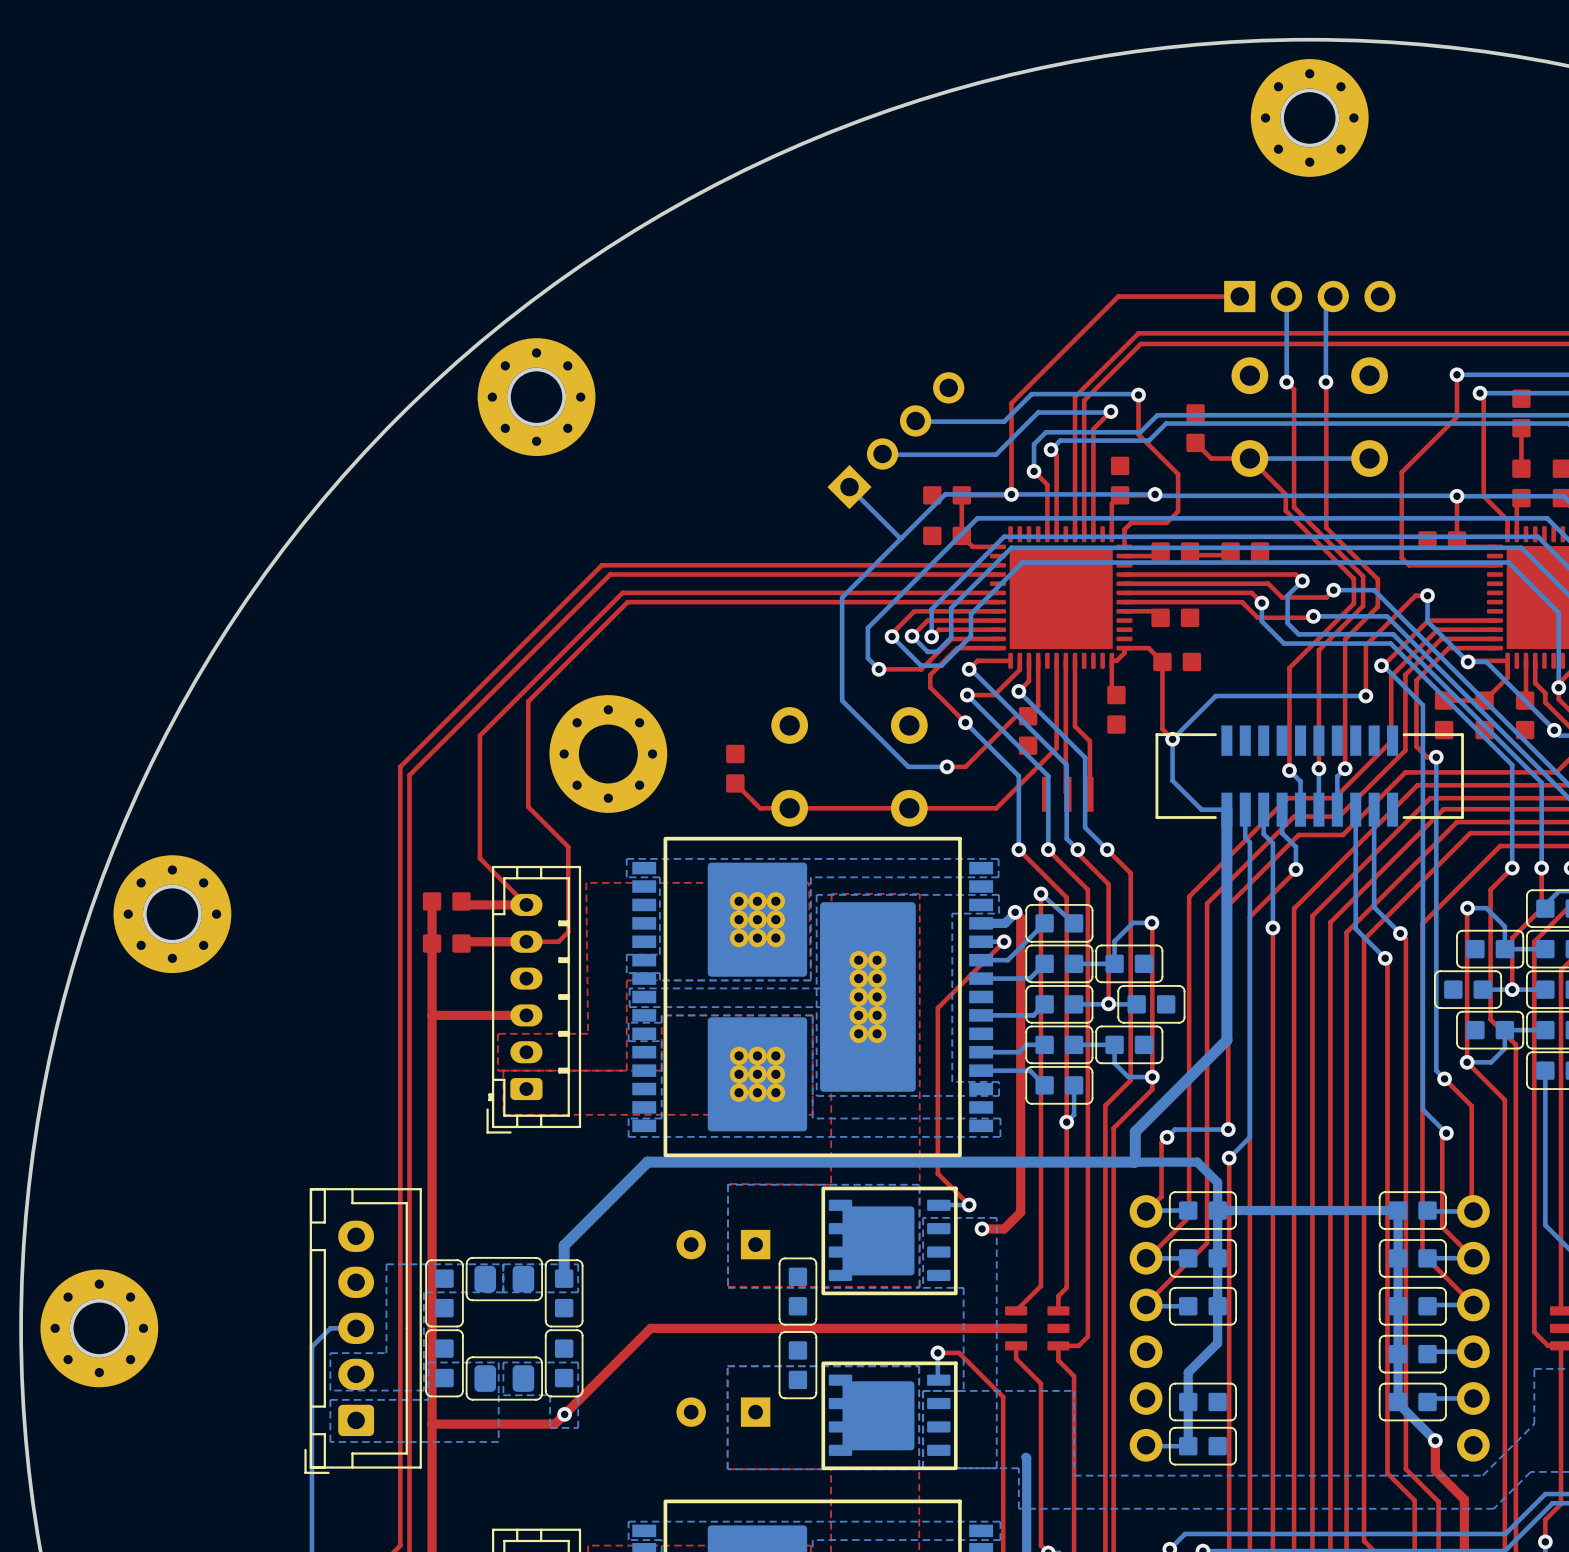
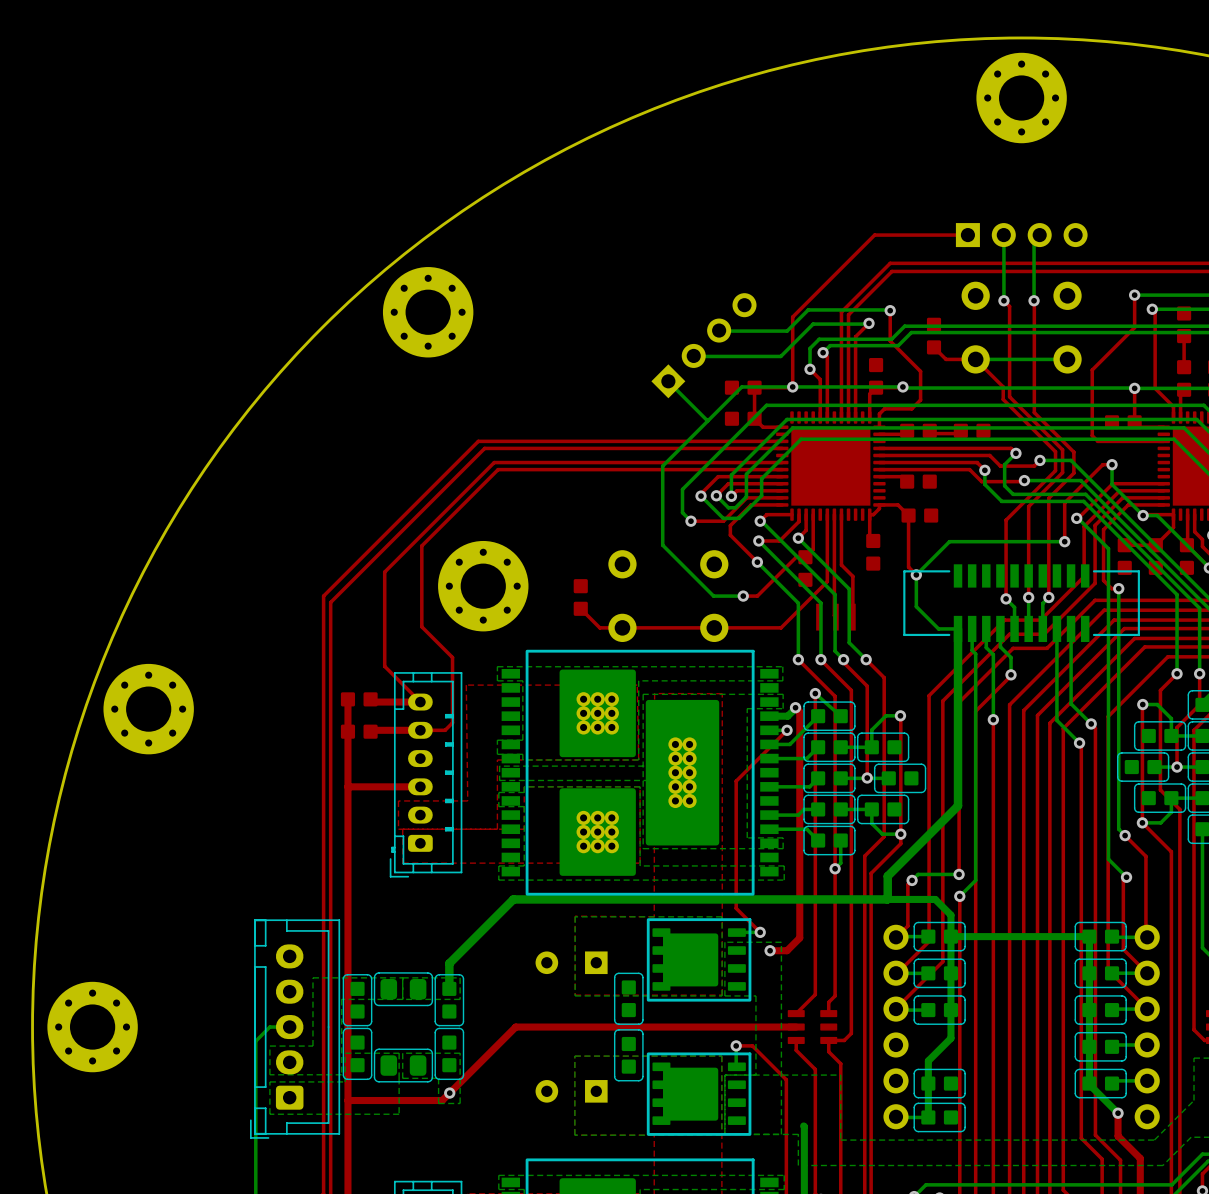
round board edge: [1280, 88, 1340, 148] -> none
round board edge: [507, 367, 567, 427] -> none
round board edge: [142, 884, 202, 944] -> none
round board edge: [69, 1298, 129, 1358] -> none

